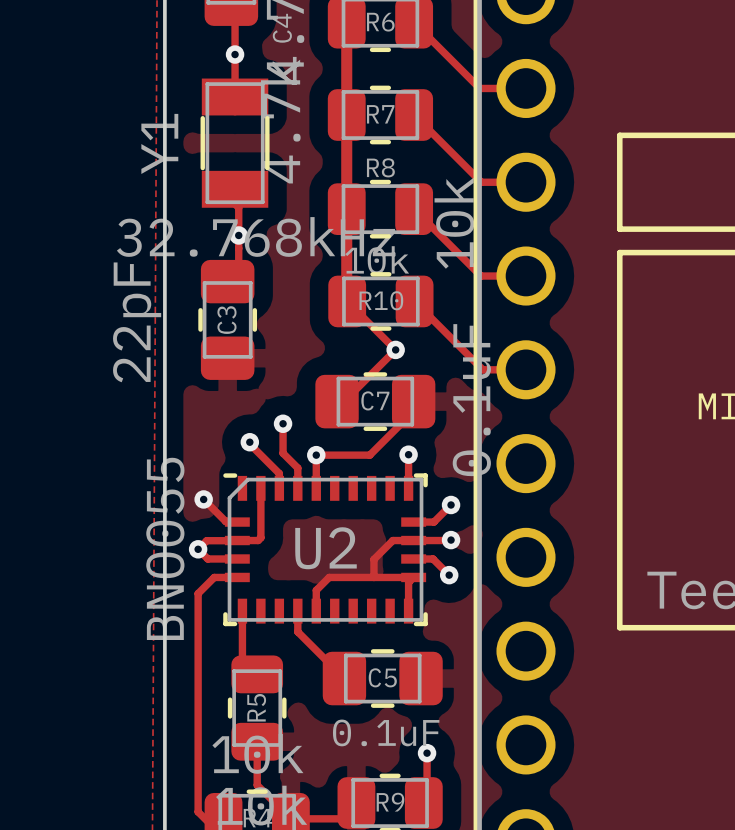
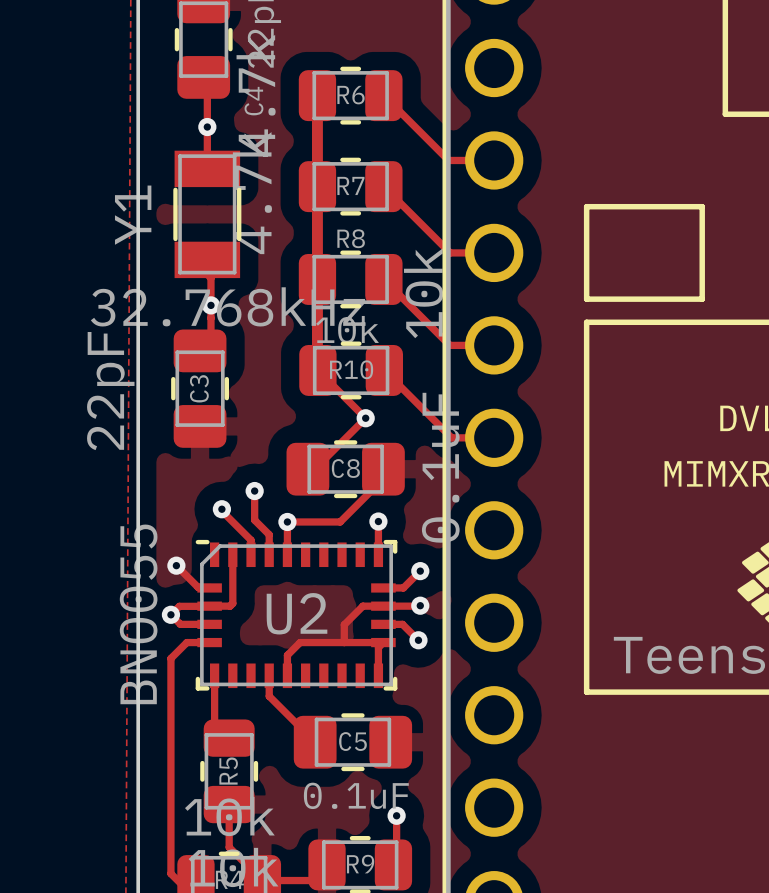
C7 name: C7 (375, 400) -> C8 (345, 468)

